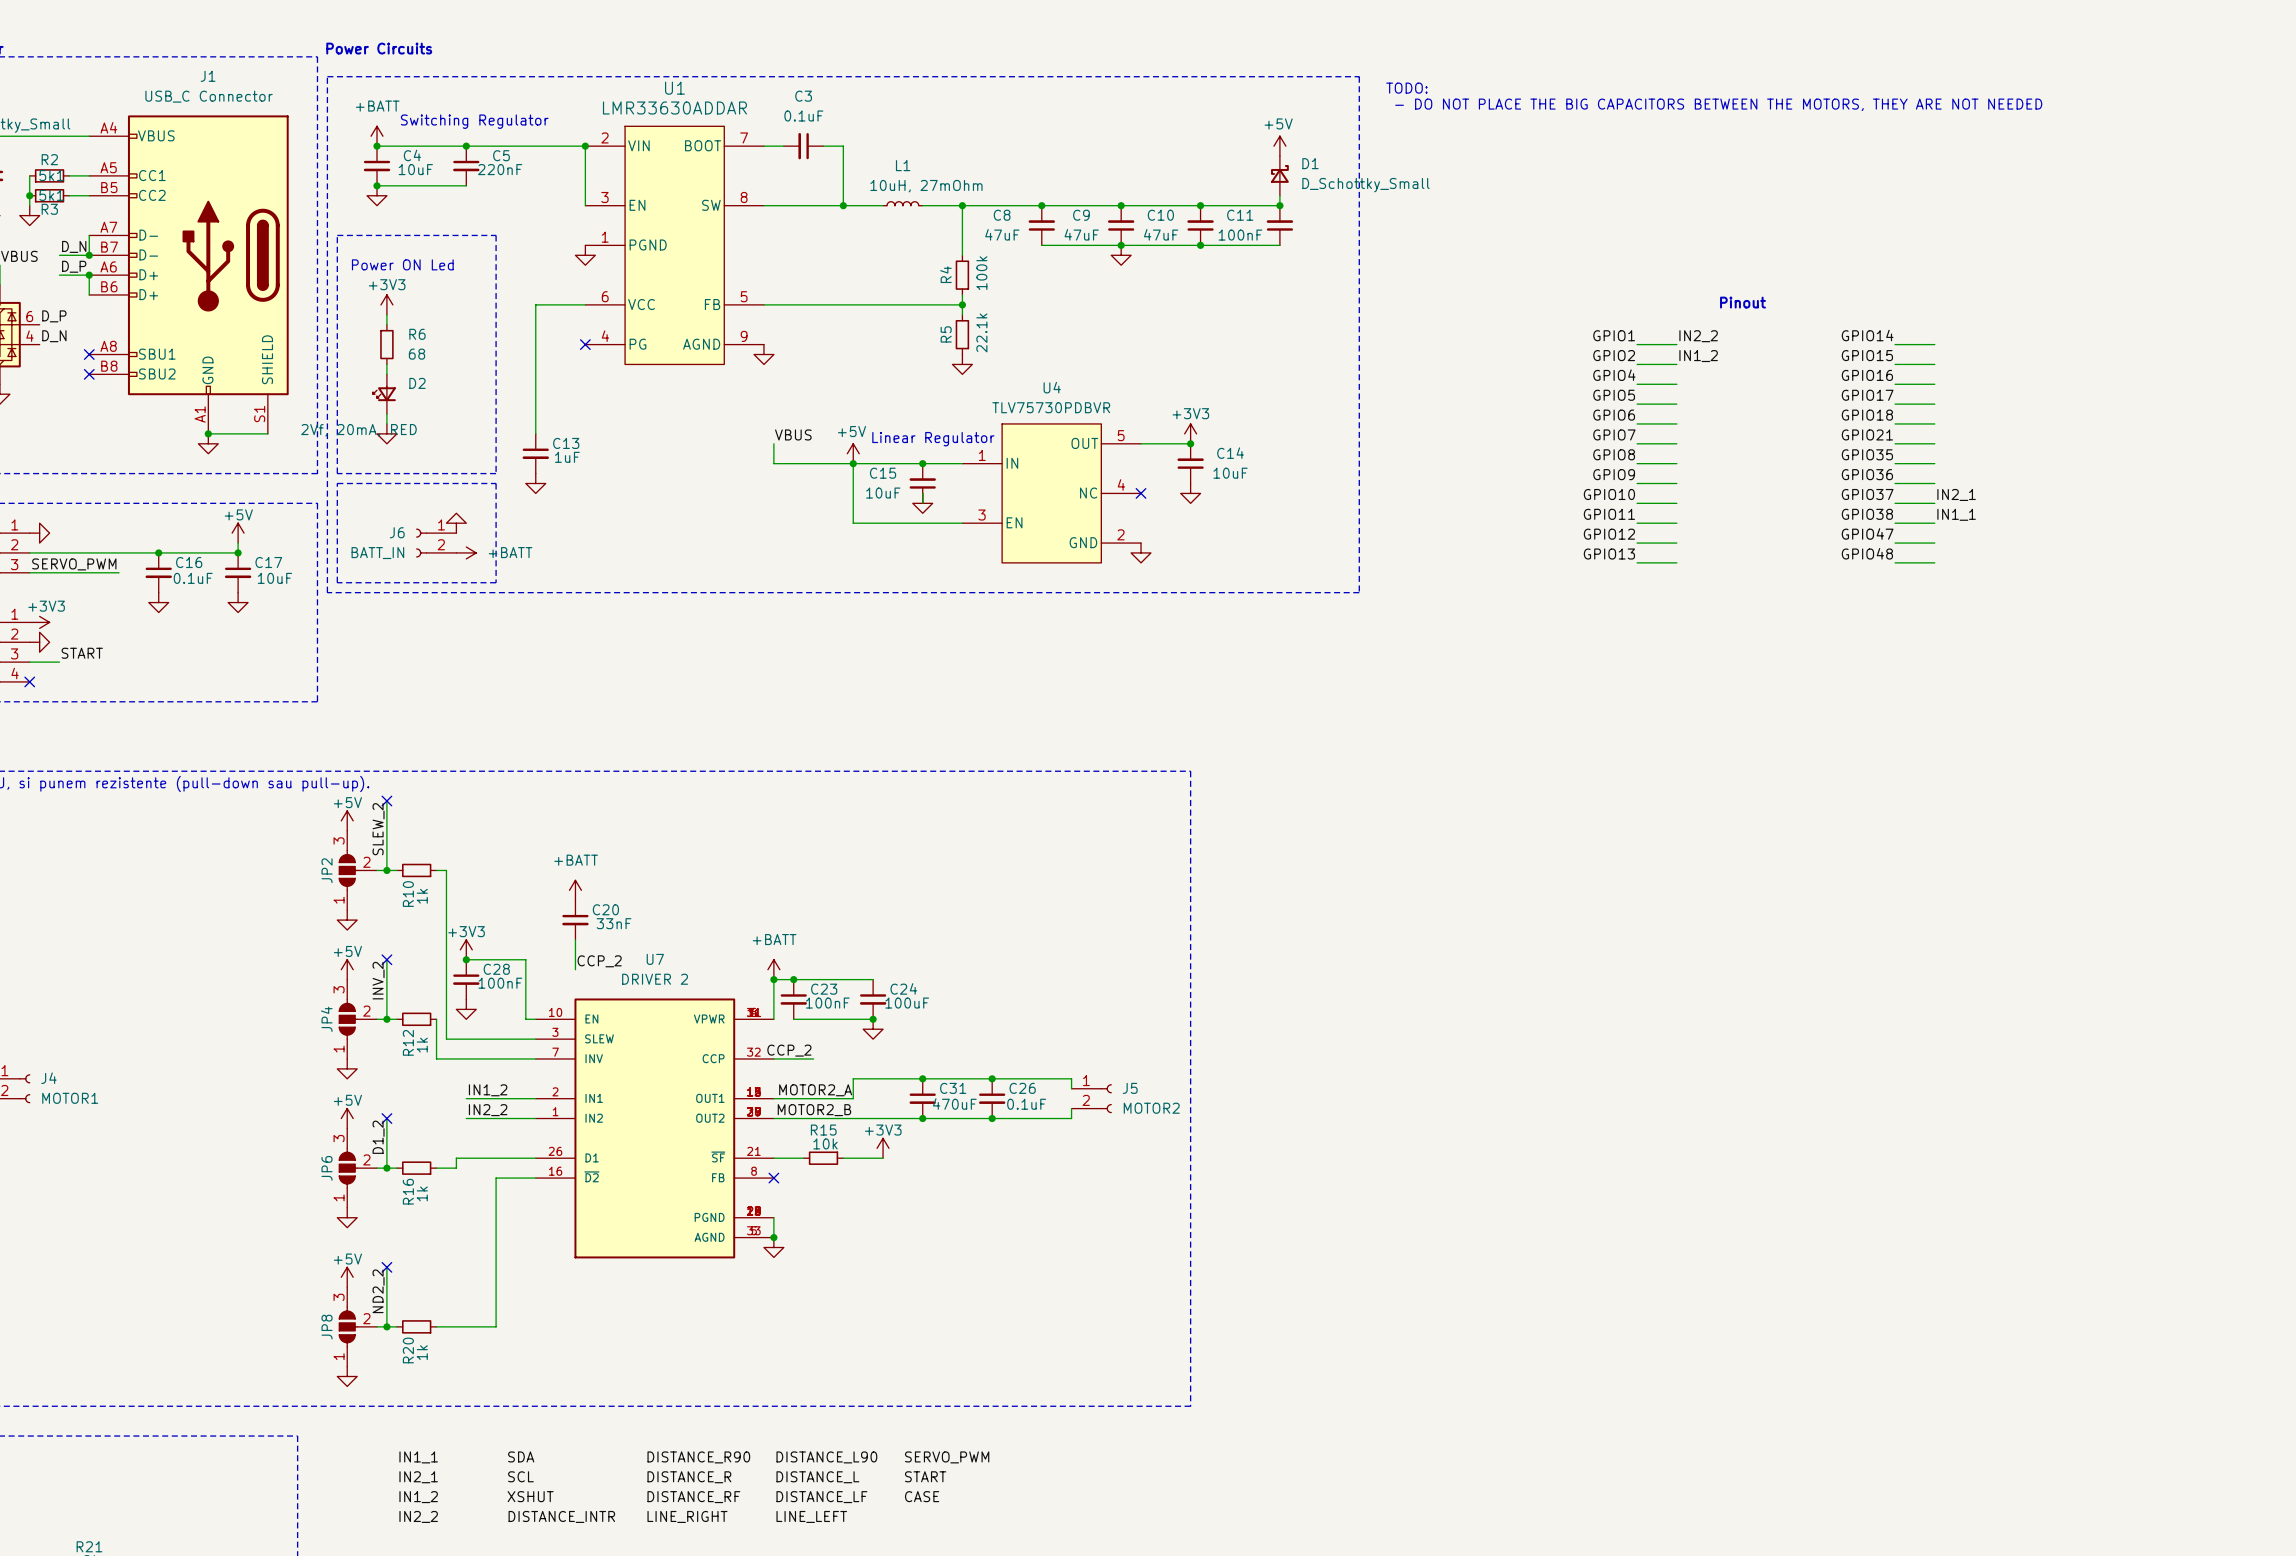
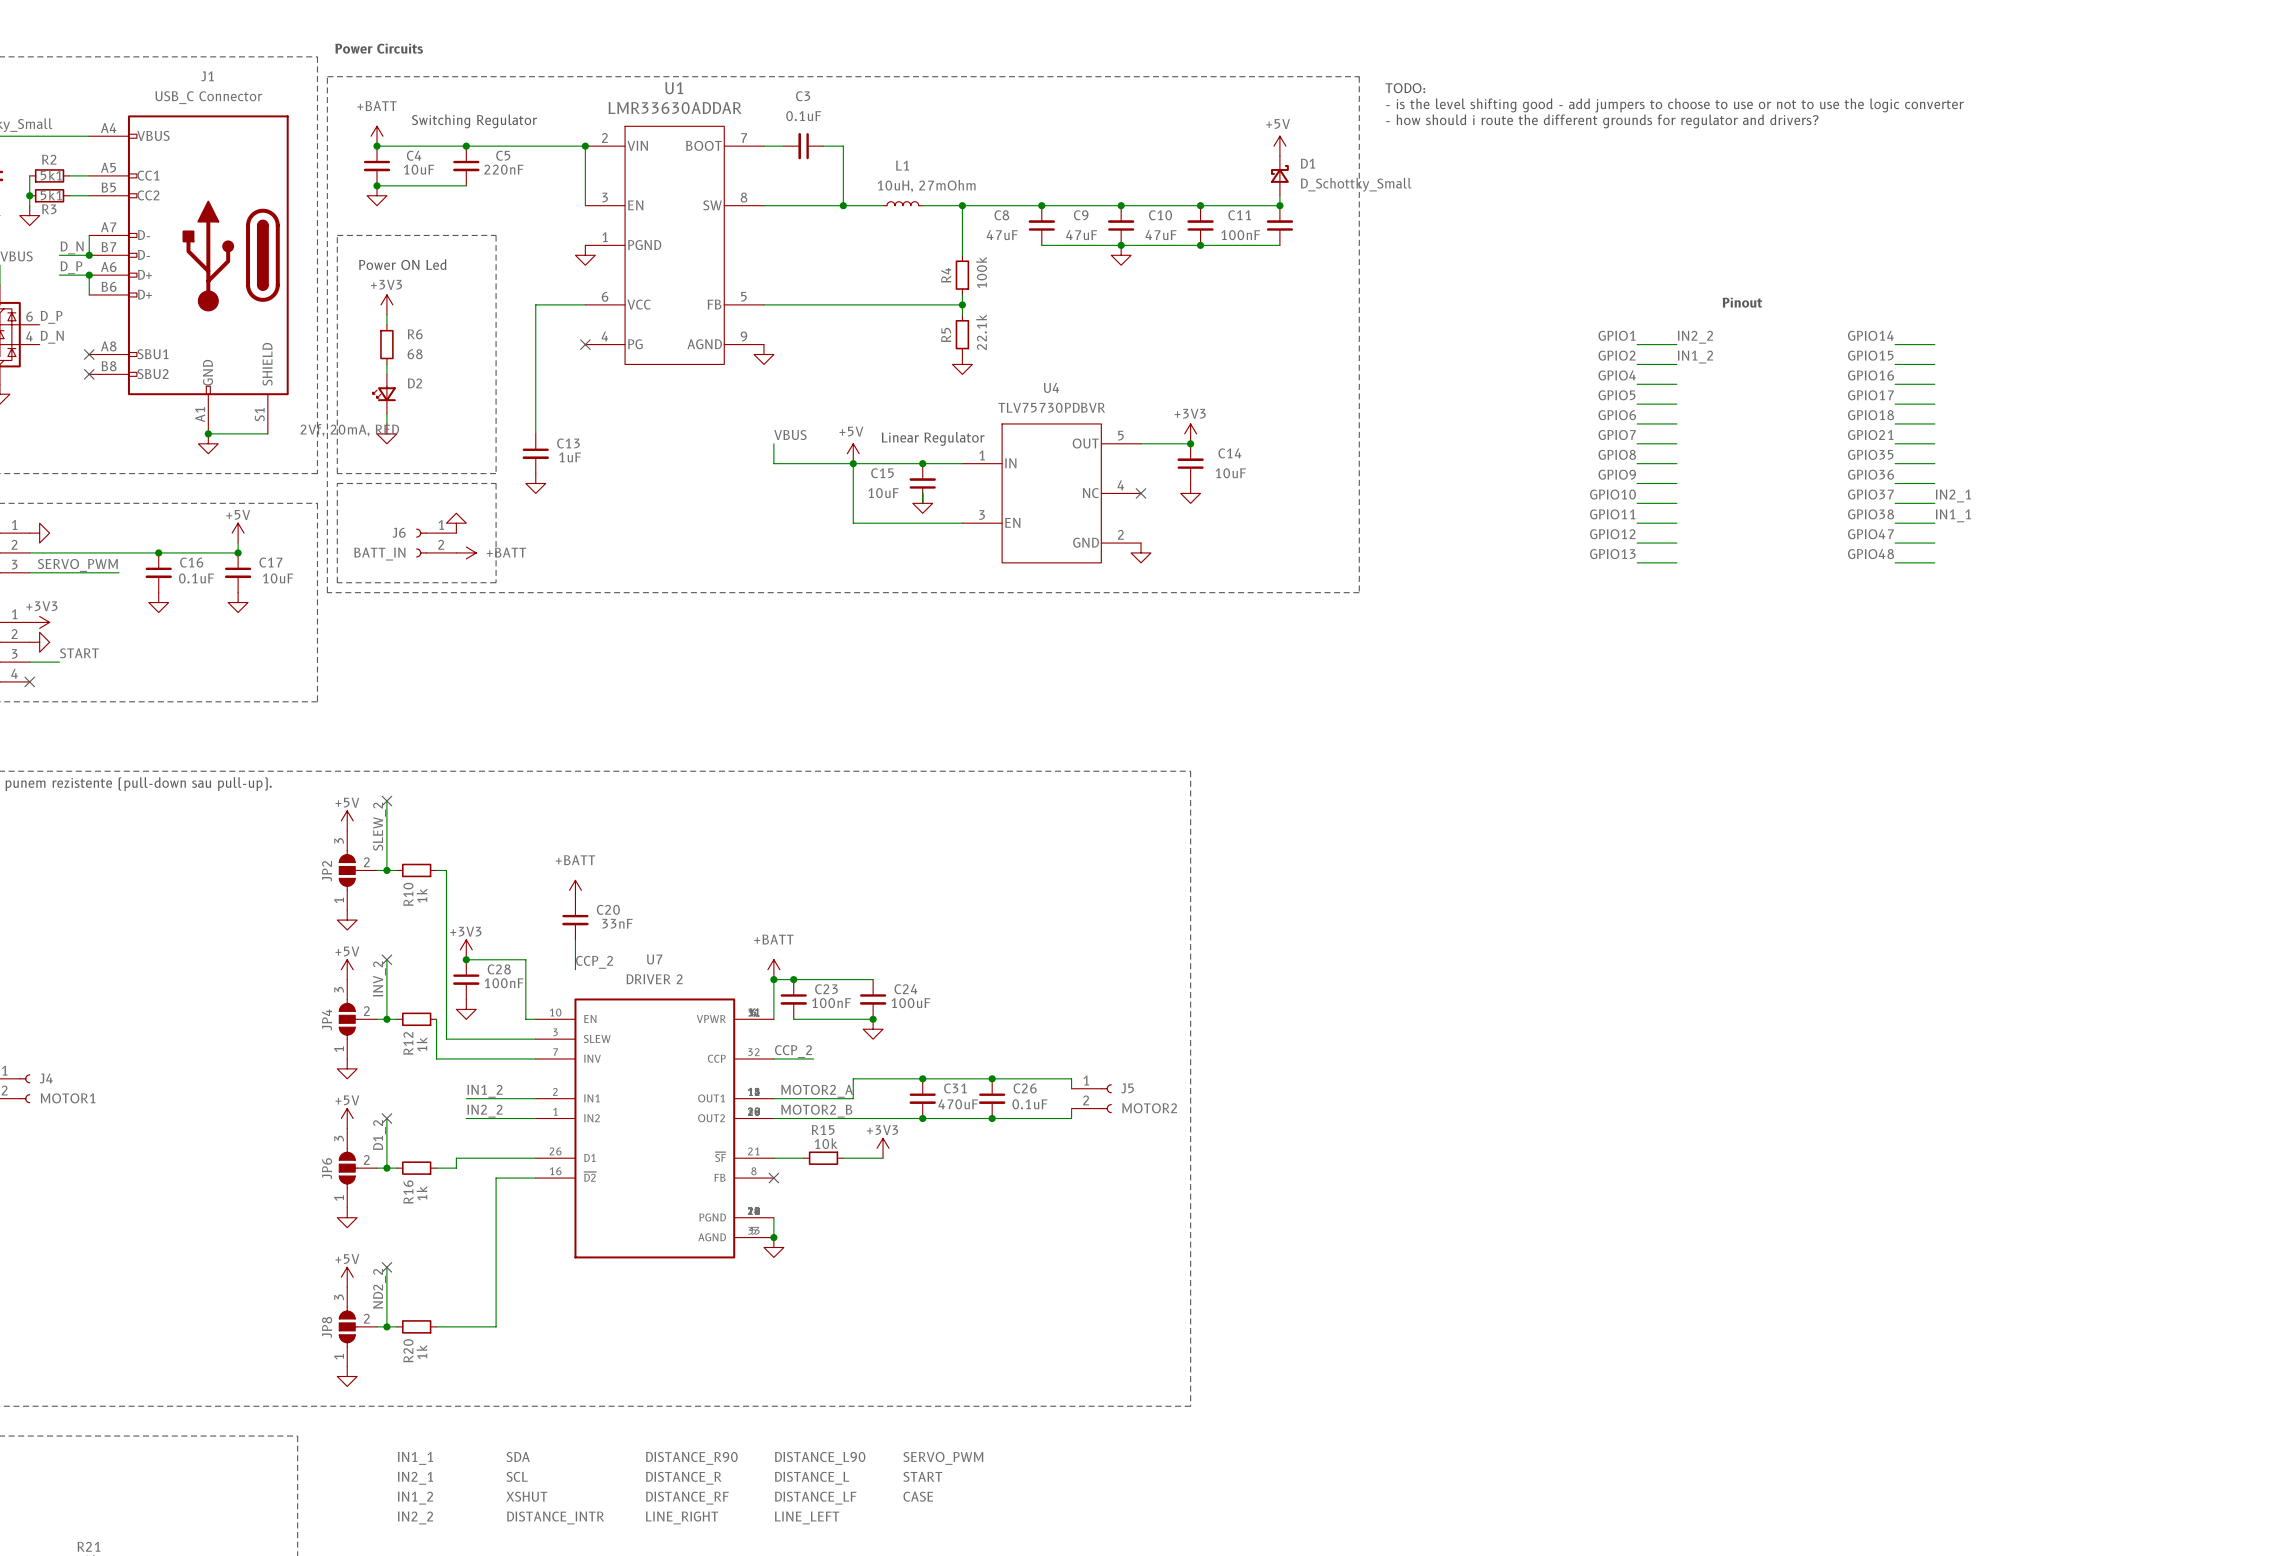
text: - DO NOT PLACE THE BIG CAPACITORS BETWEEN THE MOTORS, THEY ARE NOT NEEDED (1718, 104) -> - is the level shifting good - add jumpers to choose to use or not to use the logic converter (1675, 105)
text: none -> - how should i route the different grounds for regulator and drivers? (1602, 121)

